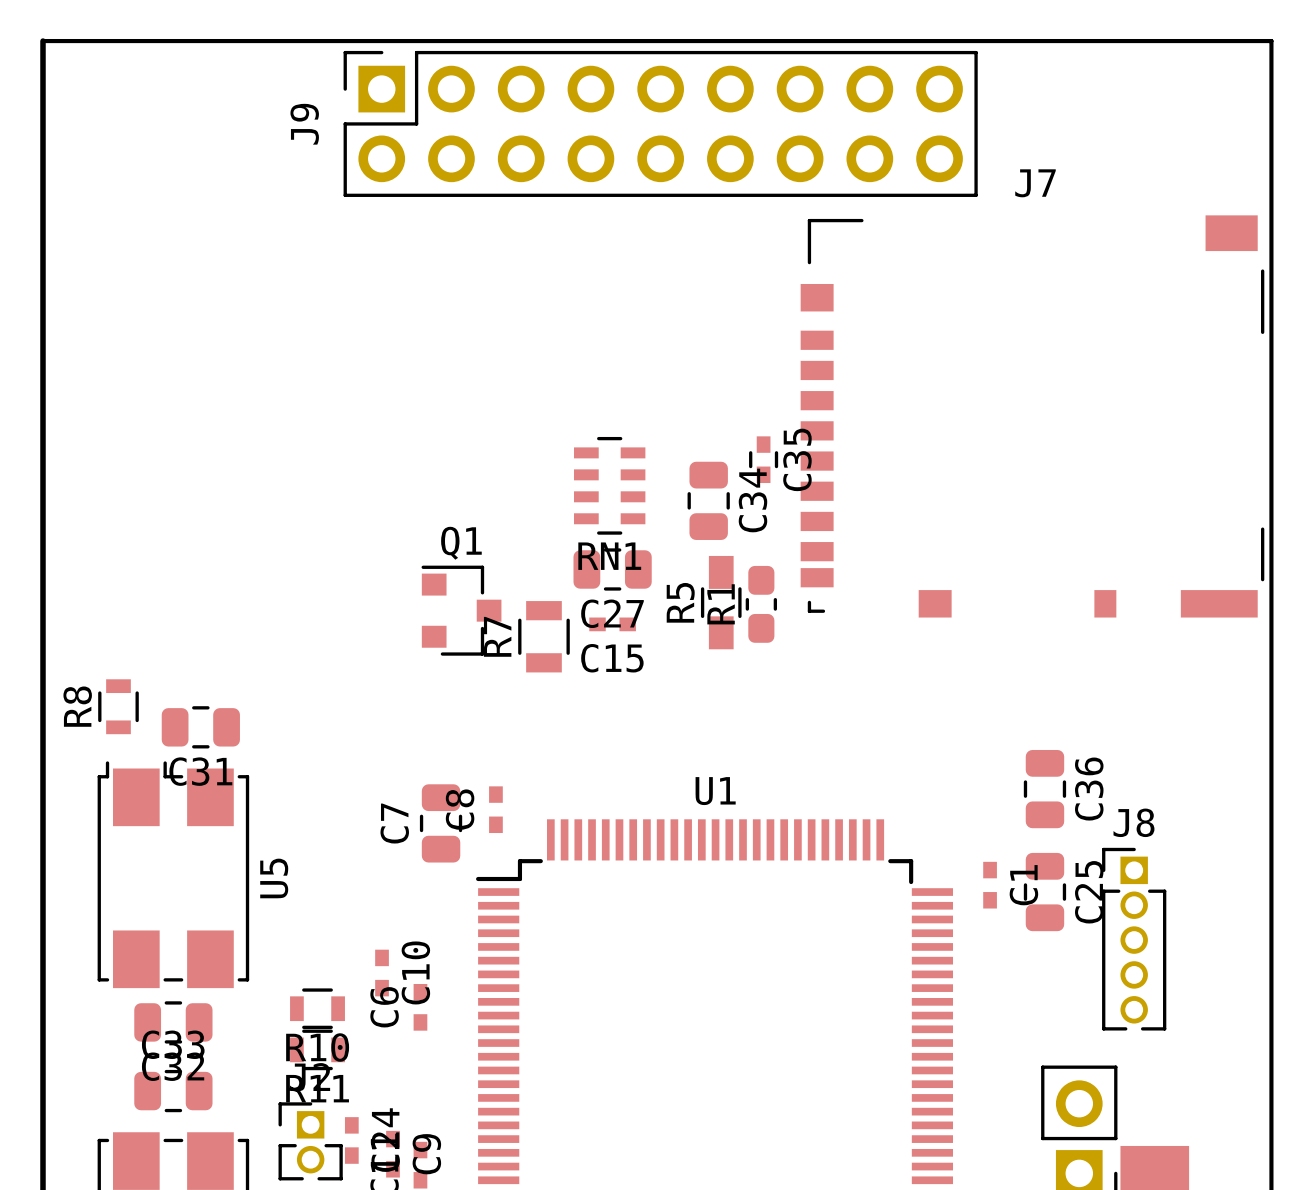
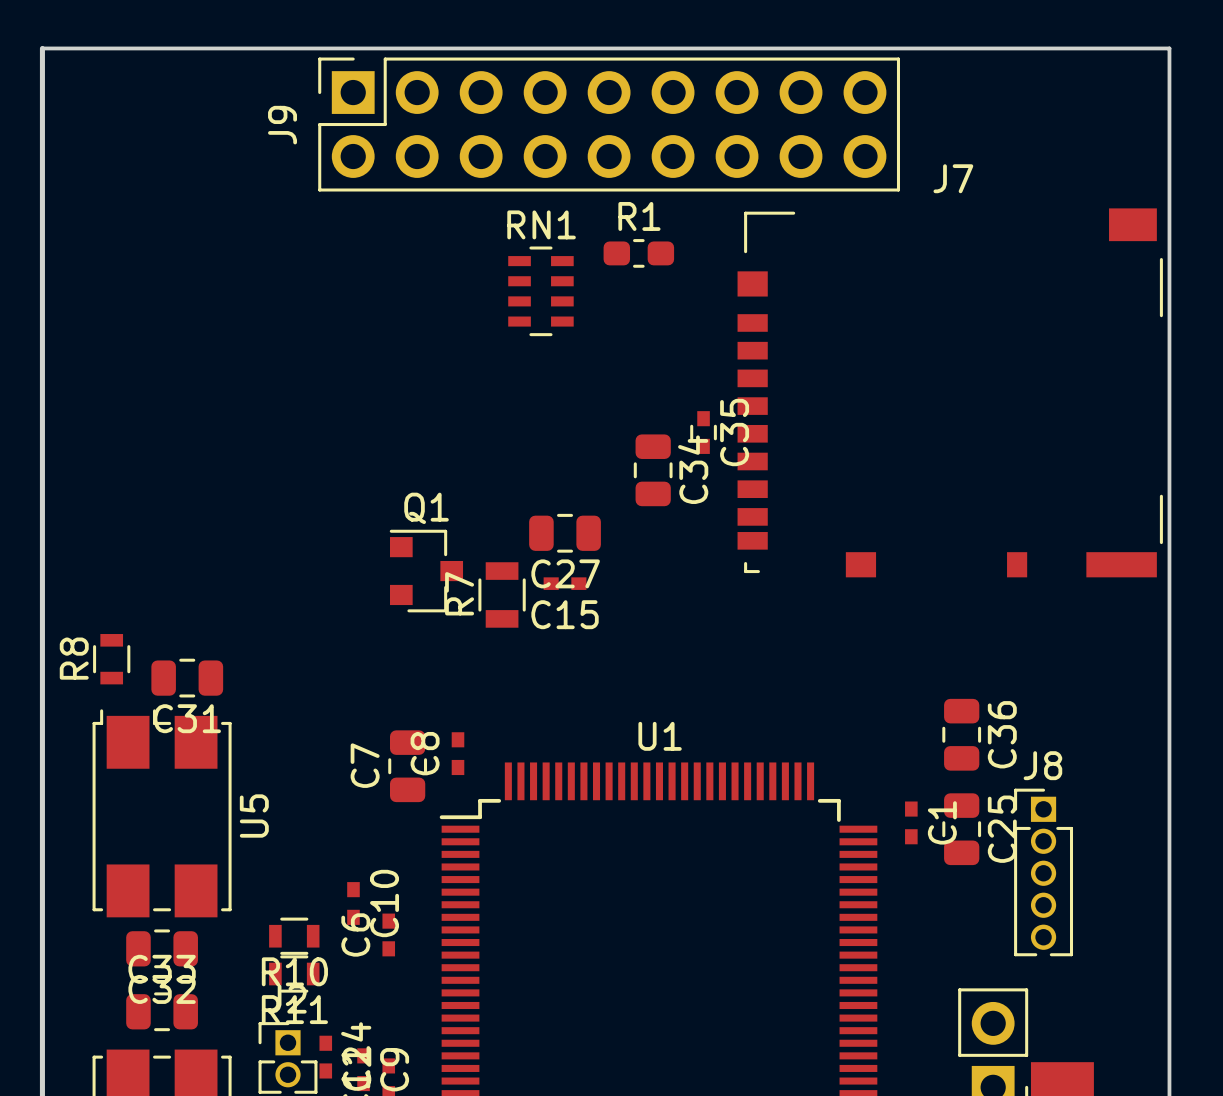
RN1 position: (609, 485) -> (540, 291)
RN1 name position: RN1 (609, 556) -> RN1 (541, 224)
R5: (721, 602) -> none
R1 rotation: 0° (761, 604) -> 90° clockwise (638, 253)
R1 position: (761, 604) -> (638, 253)

